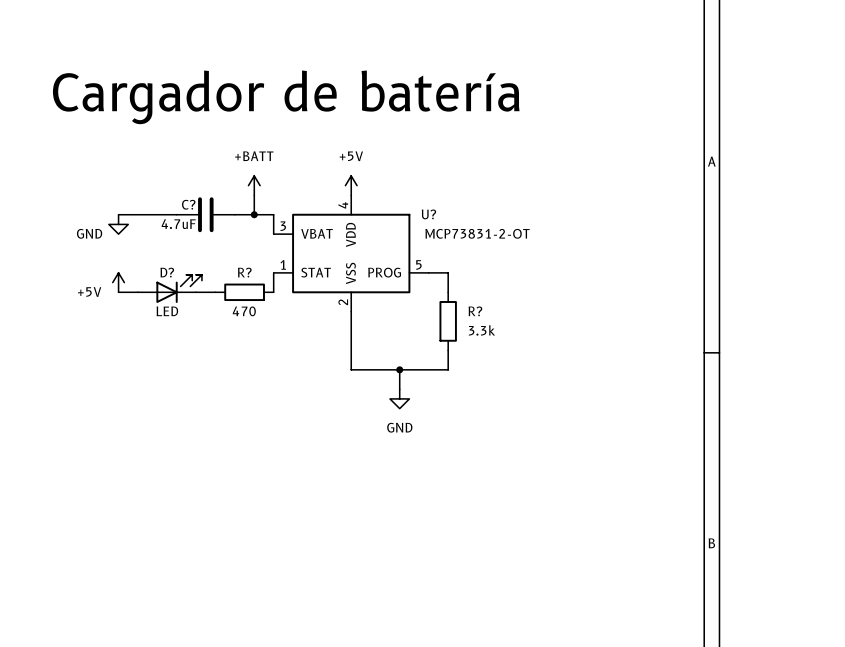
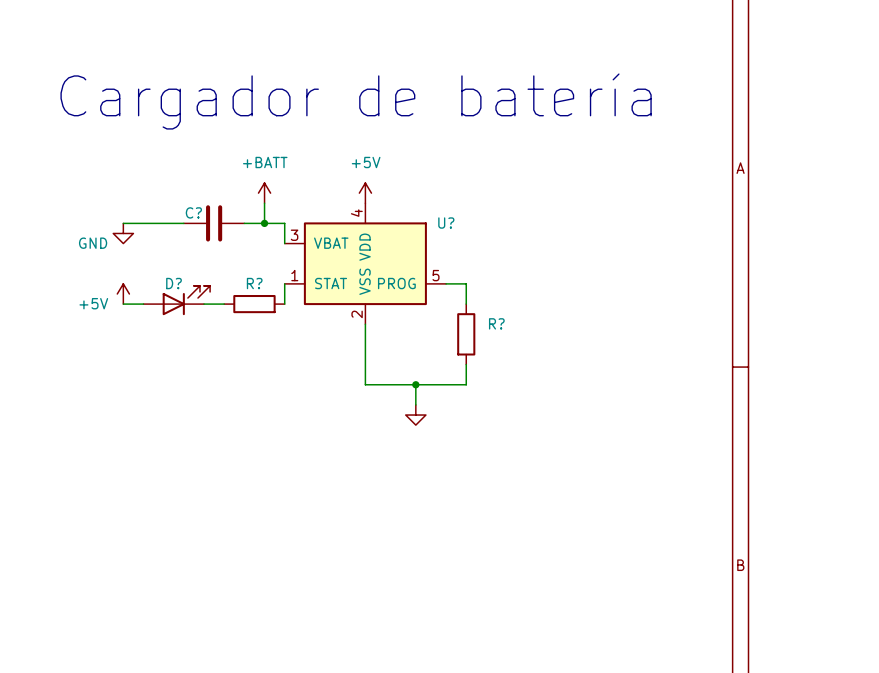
C? value: 4.7uF (178, 224) -> none
U? value: MCP73831-2-OT (477, 233) -> none
D? value: LED (167, 311) -> none
R? value: 470 (244, 311) -> none
R? value: 3.3k (481, 330) -> none
power symbol text: GND (399, 427) -> none

